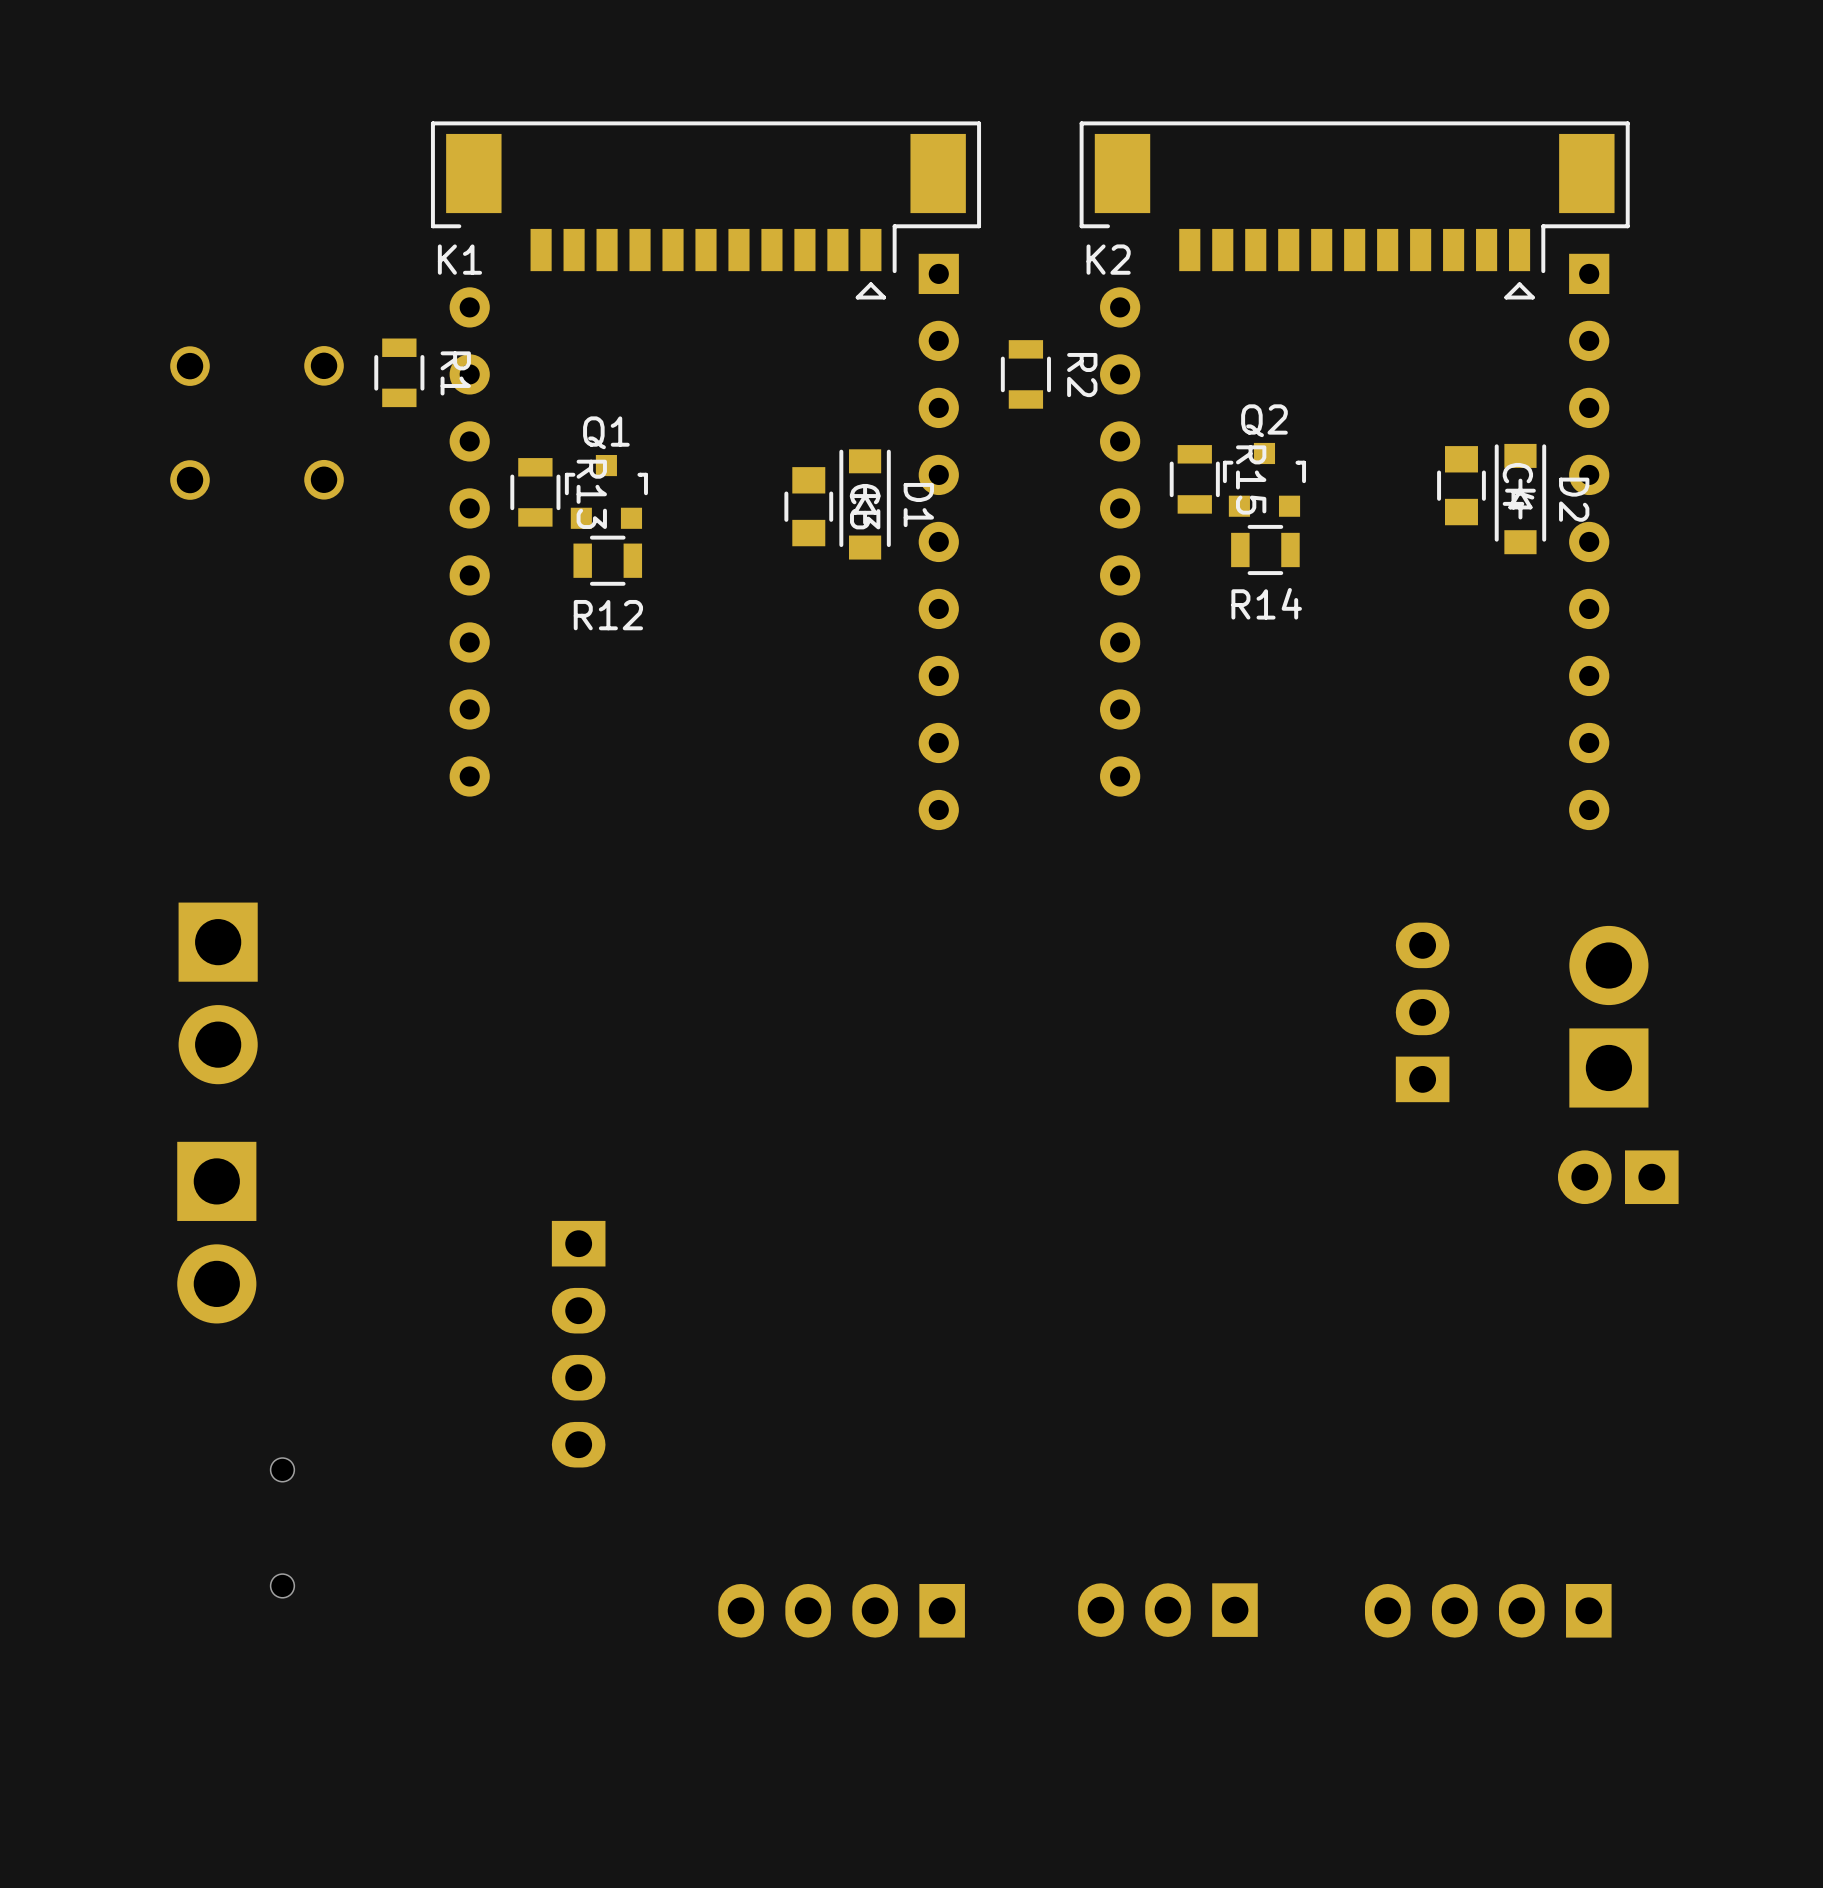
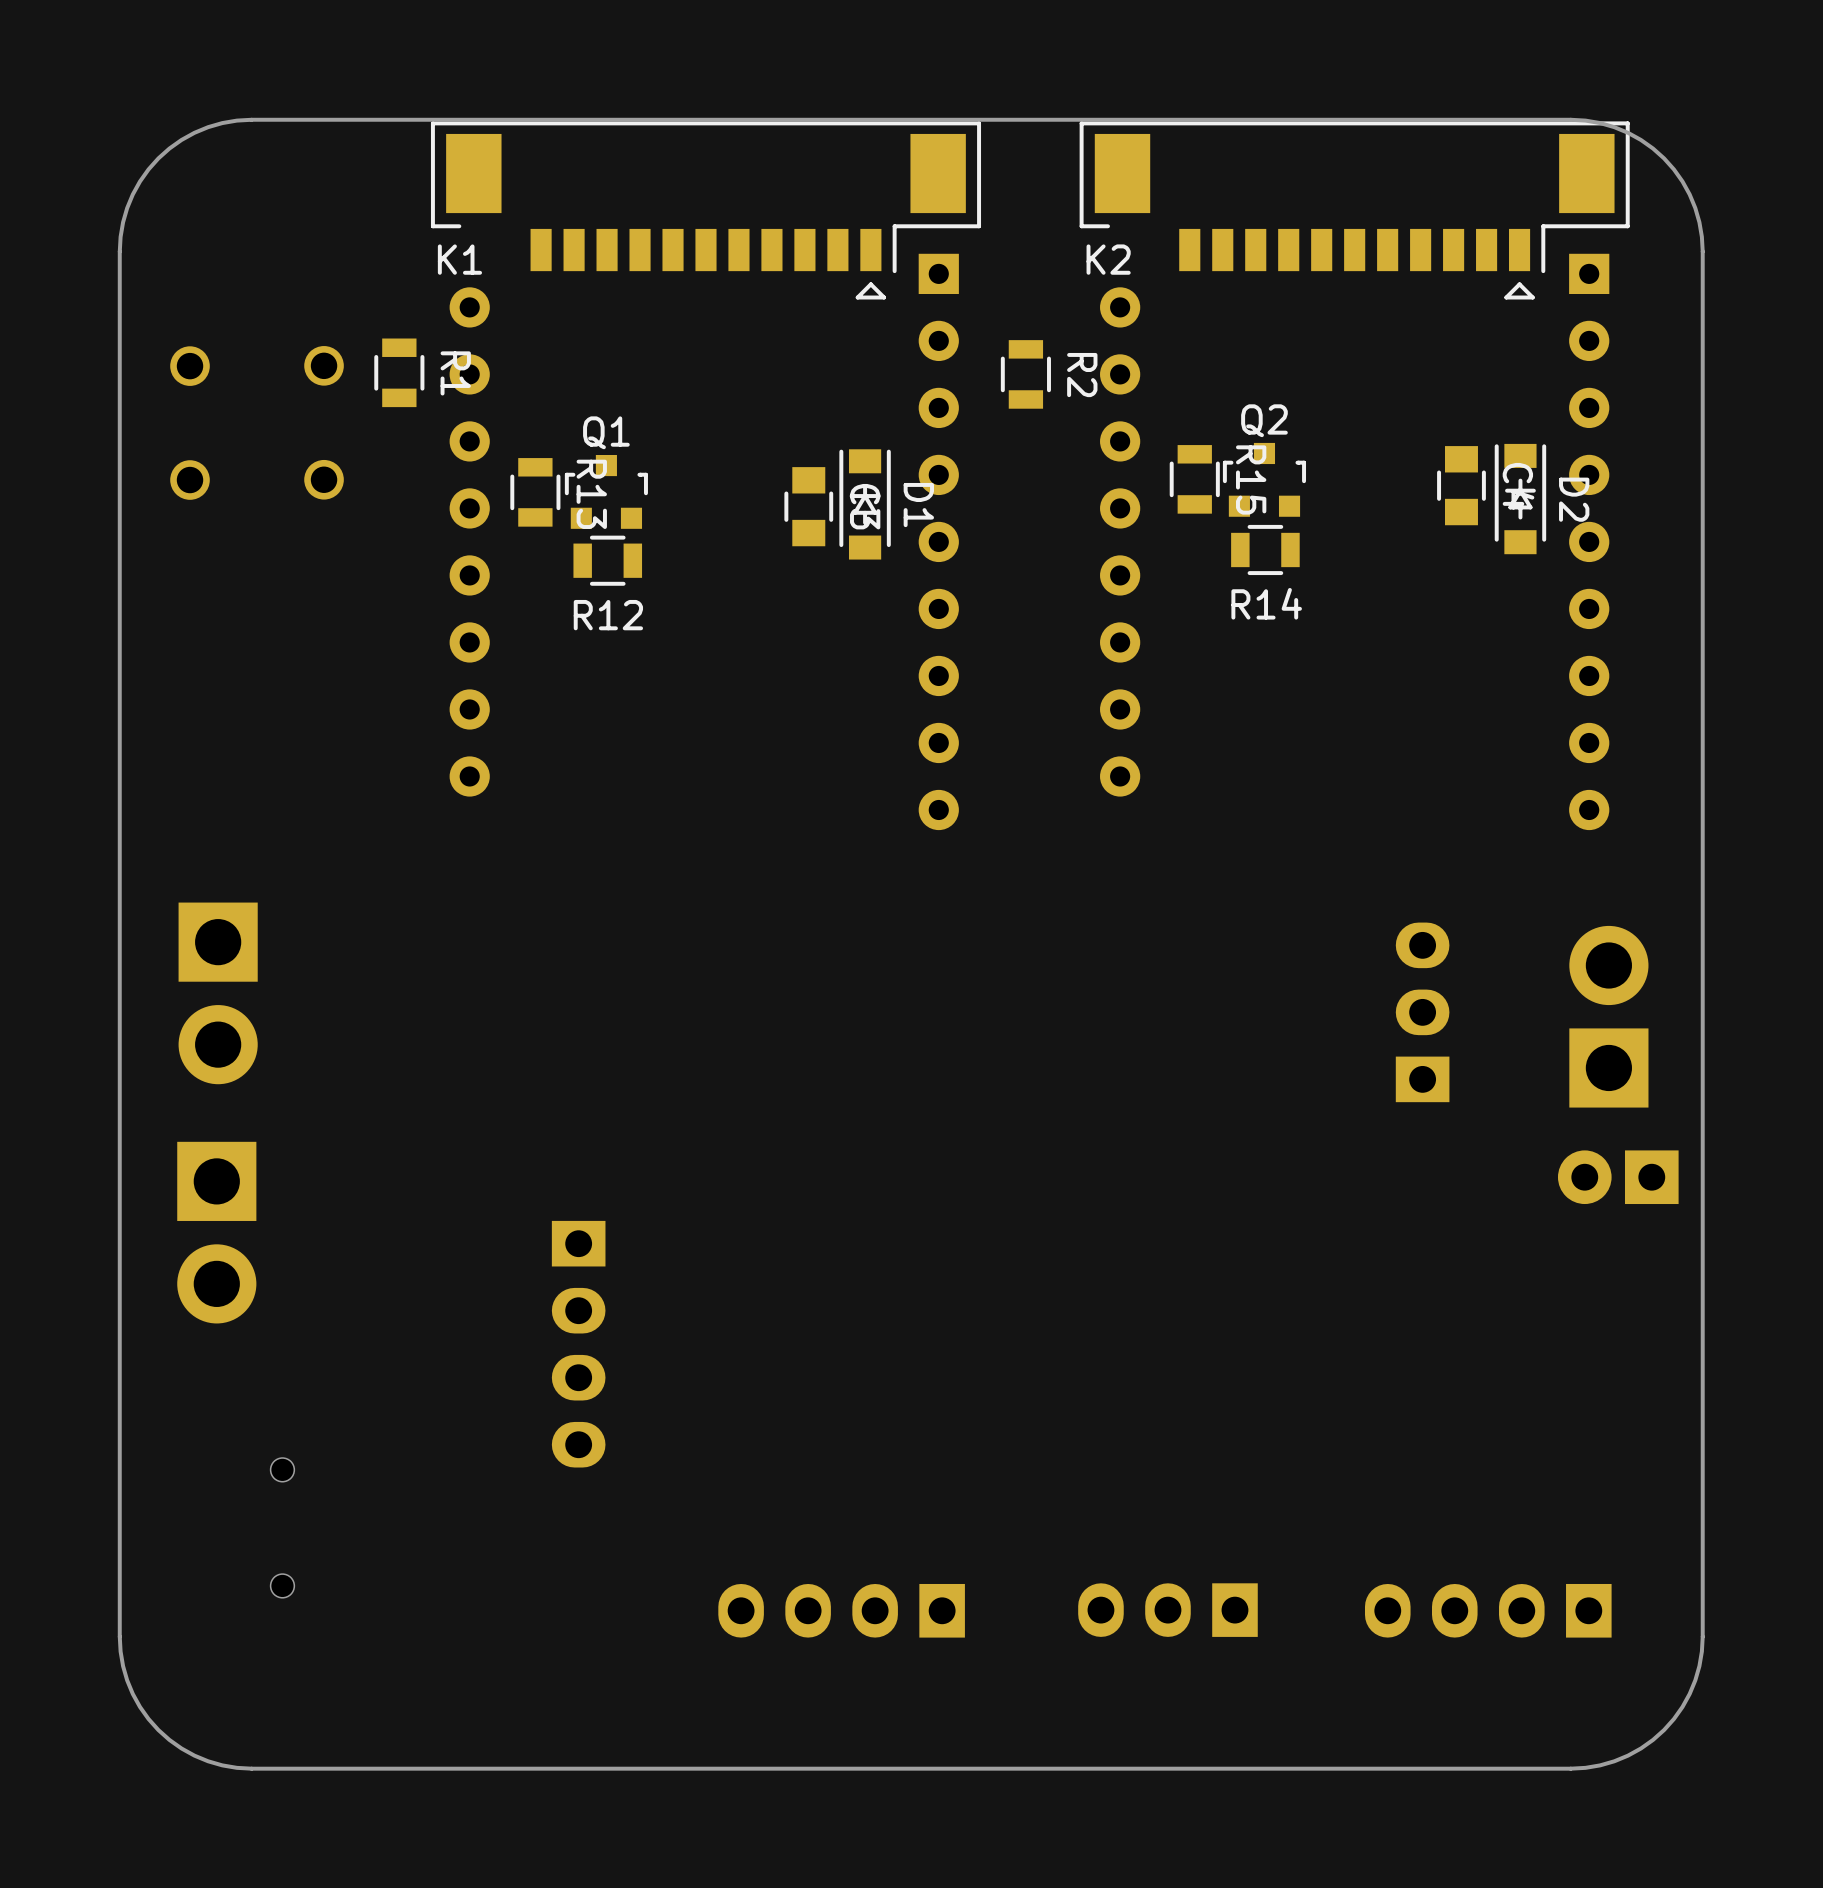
board edge: none -> (1570, 119) (251, 119) (222, 123) (194, 132) (169, 148) (148, 169) (139, 181) (127, 208) (120, 236) (119, 251) (119, 1636) (123, 1666) (132, 1694) (148, 1719) (169, 1739) (194, 1755) (208, 1761) (236, 1767) (251, 1768) (1570, 1768) (1600, 1765) (1628, 1755) (1653, 1739) (1673, 1719) (1682, 1706) (1695, 1680) (1699, 1666) (1702, 1636) (1701, 236) (1695, 208) (1682, 181) (1664, 158) (1653, 148) (1628, 132) (1614, 127) (1585, 120) (1570, 119)

